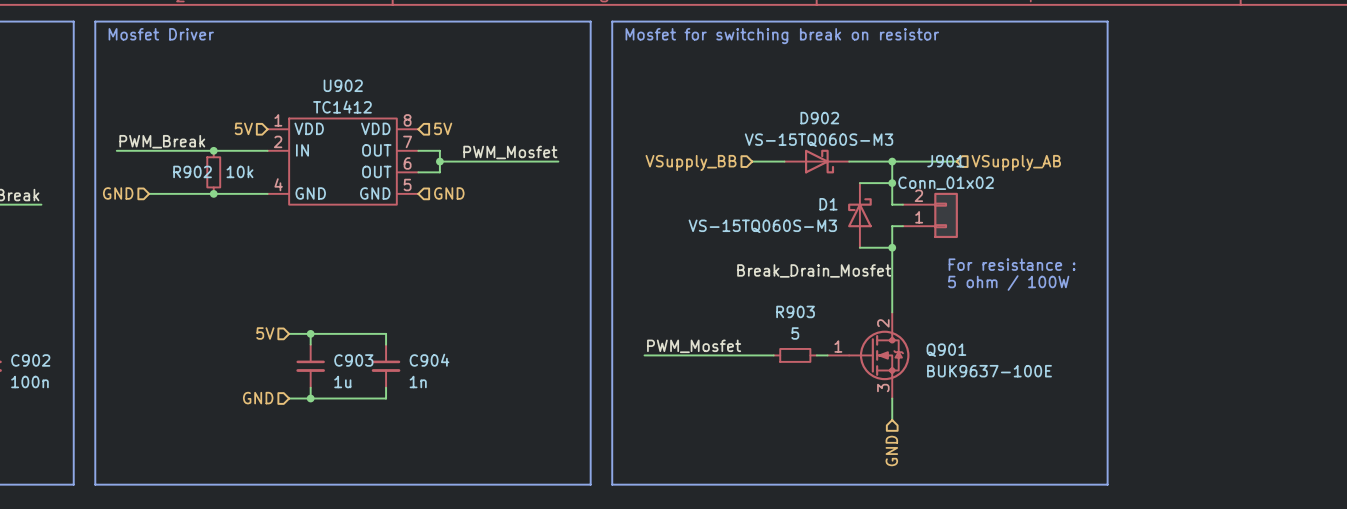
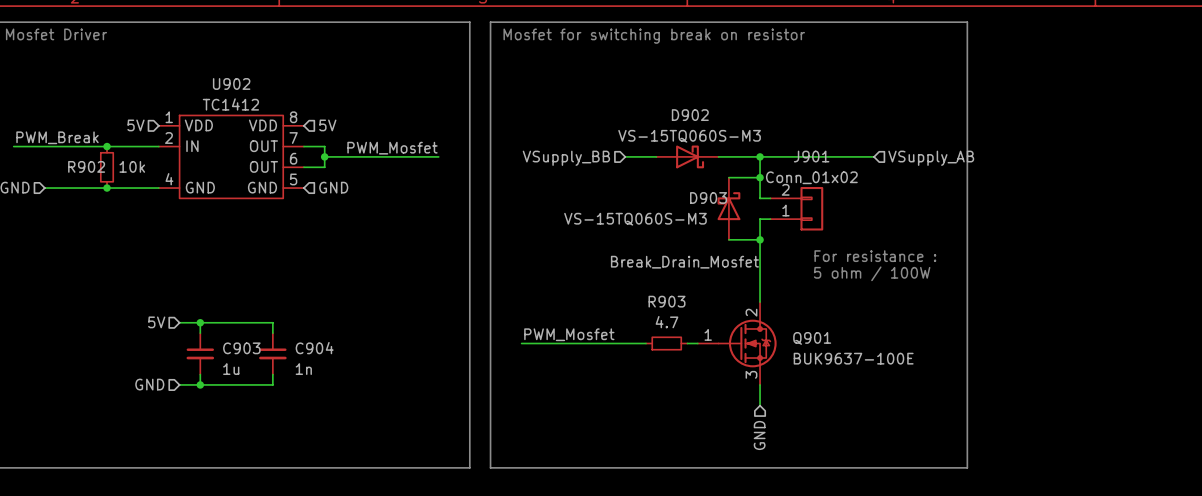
wire: none -> (822, 156) (874, 156)
hierarchical label position: VSupply_AB (1016, 162) -> VSupply_AB (931, 158)
D1 name: D1 (828, 204) -> D903 (708, 198)
R903 value: 5 (795, 333) -> 4.7 (666, 322)

